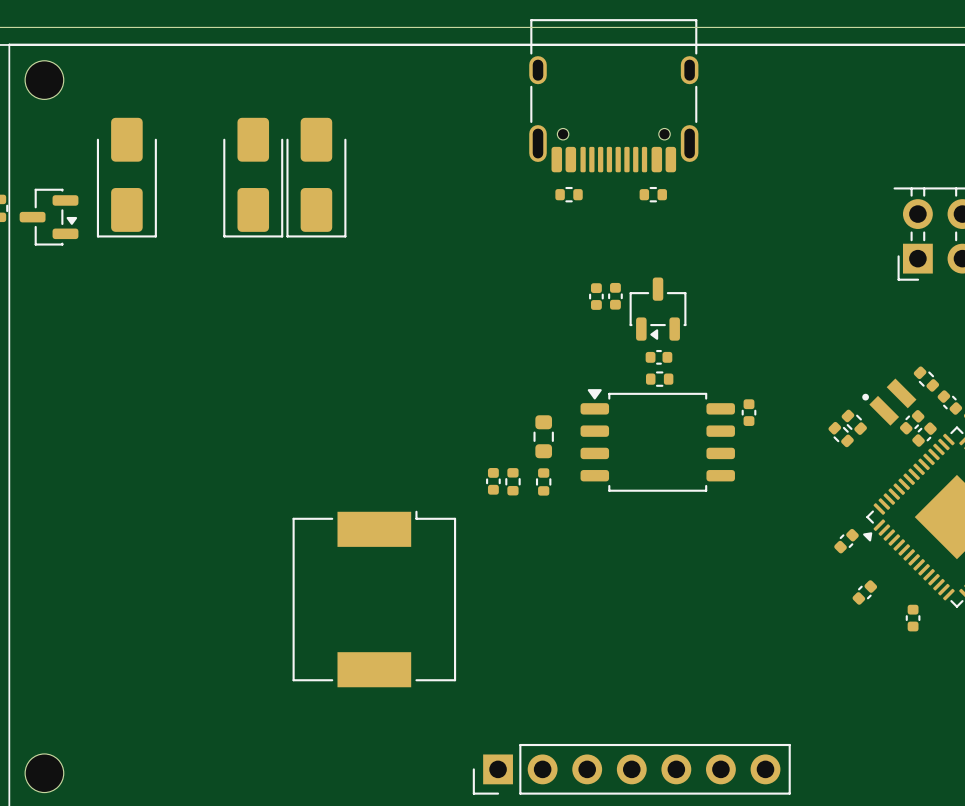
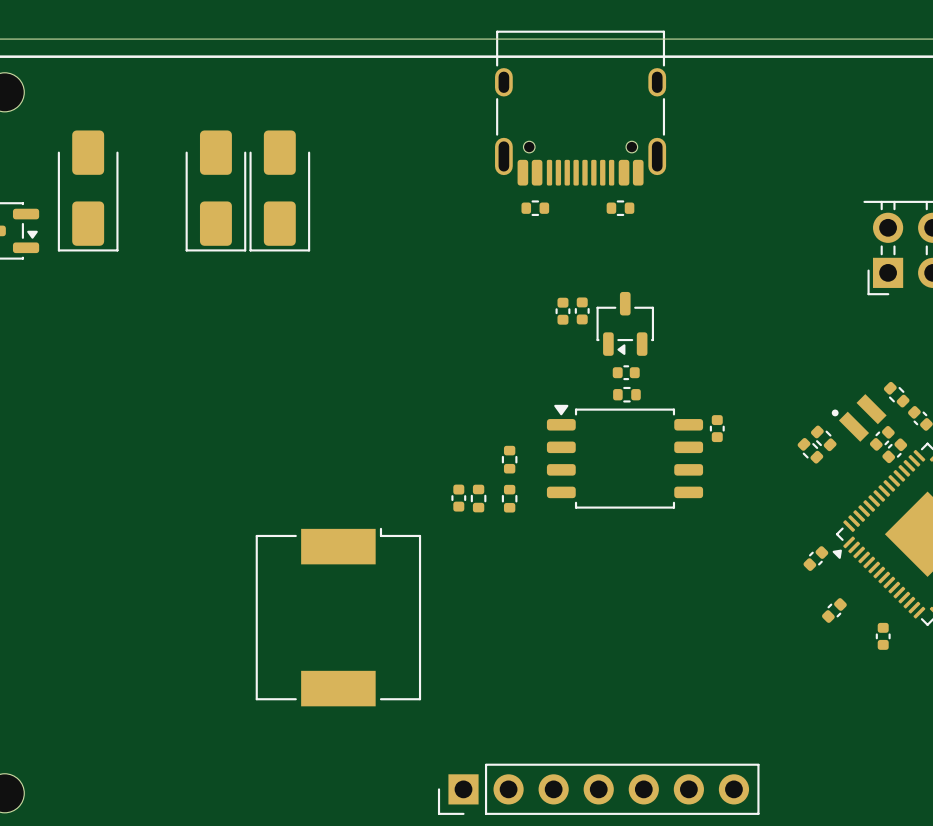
part footprint: [533, 415, 554, 459] -> [501, 445, 518, 474]

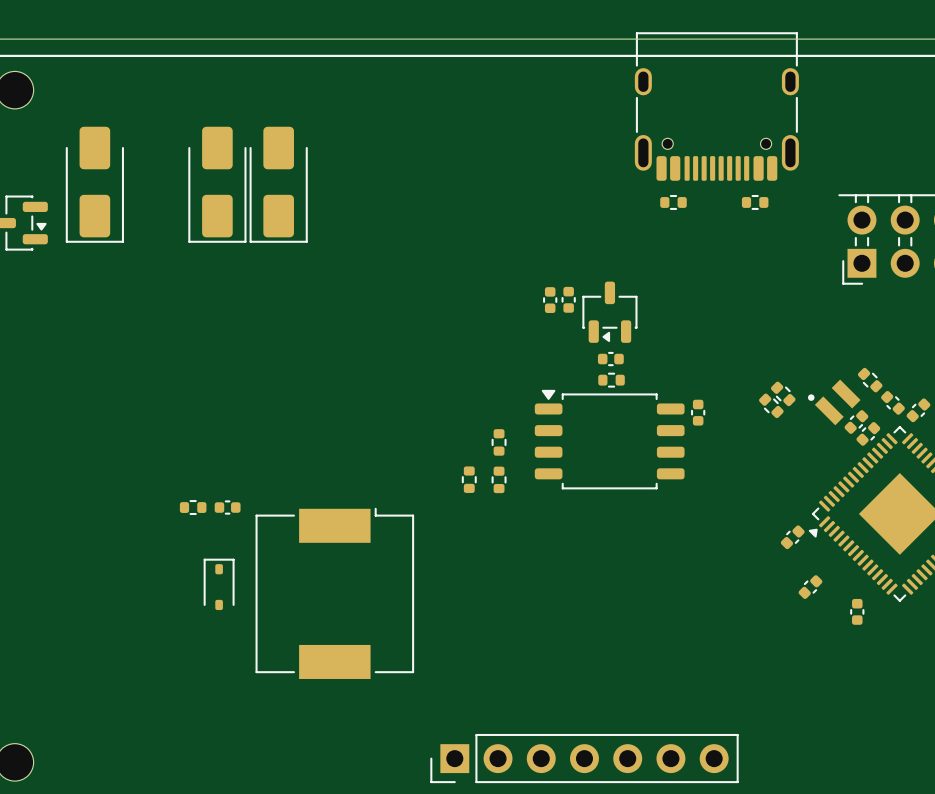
part position: (580, 108) -> (716, 106)
part: (535, 208) -> none
part position: (620, 208) -> (673, 202)
part: none -> (755, 202)
part: none -> (783, 393)
part: none -> (771, 405)
part: (823, 438) -> none
part: (810, 450) -> none
part rotation: 0° (458, 498) -> 90° clockwise (227, 507)
part position: (458, 498) -> (227, 507)
part: none -> (193, 507)
part: none -> (219, 584)

